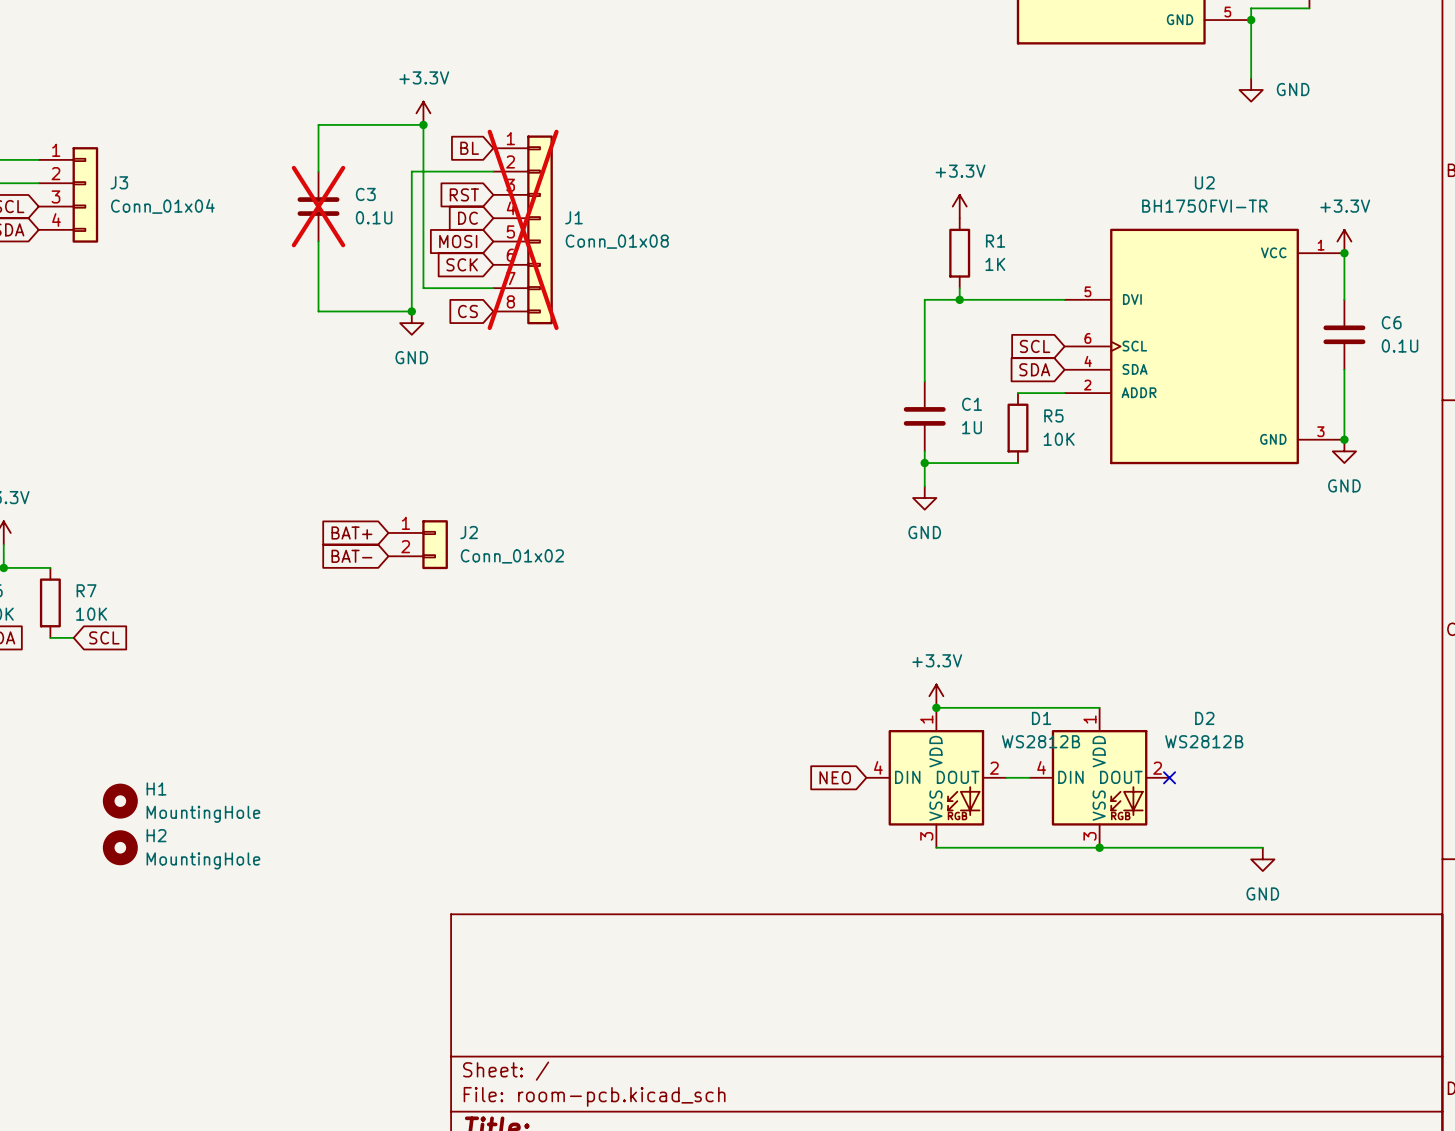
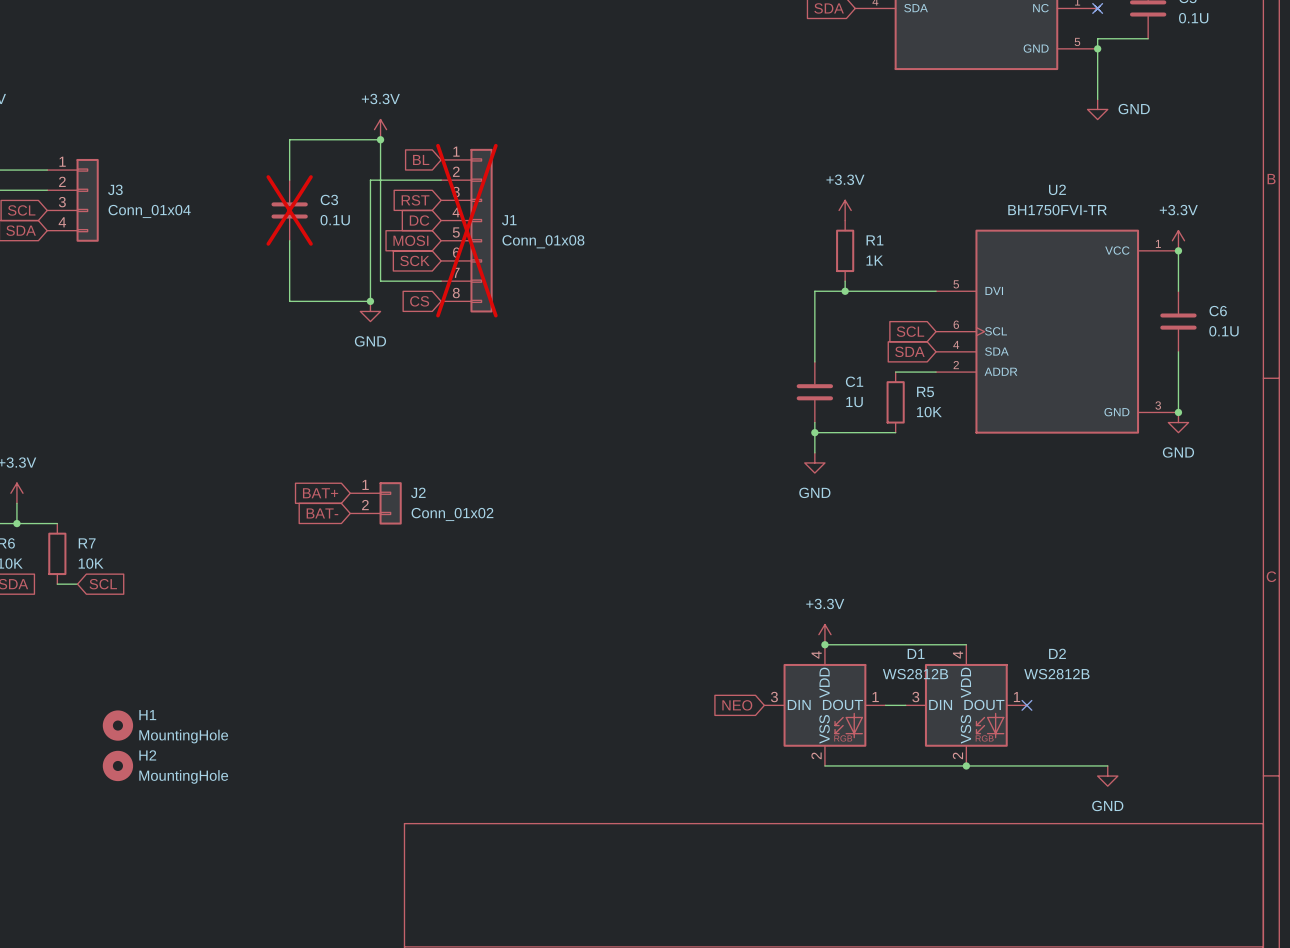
D1 pin number: 1 (926, 719) -> 4 (816, 654)
D2 pin number: 1 (1089, 719) -> 4 (958, 654)
D1 pin number: 4 (878, 767) -> 3 (774, 697)
D2 pin number: 4 (1041, 767) -> 3 (915, 697)
D1 pin number: 2 (994, 768) -> 1 (875, 697)
D2 pin number: 2 (1157, 768) -> 1 (1017, 697)
D1 pin number: 3 (926, 836) -> 2 (816, 755)
D2 pin number: 3 (1089, 836) -> 2 (957, 755)

